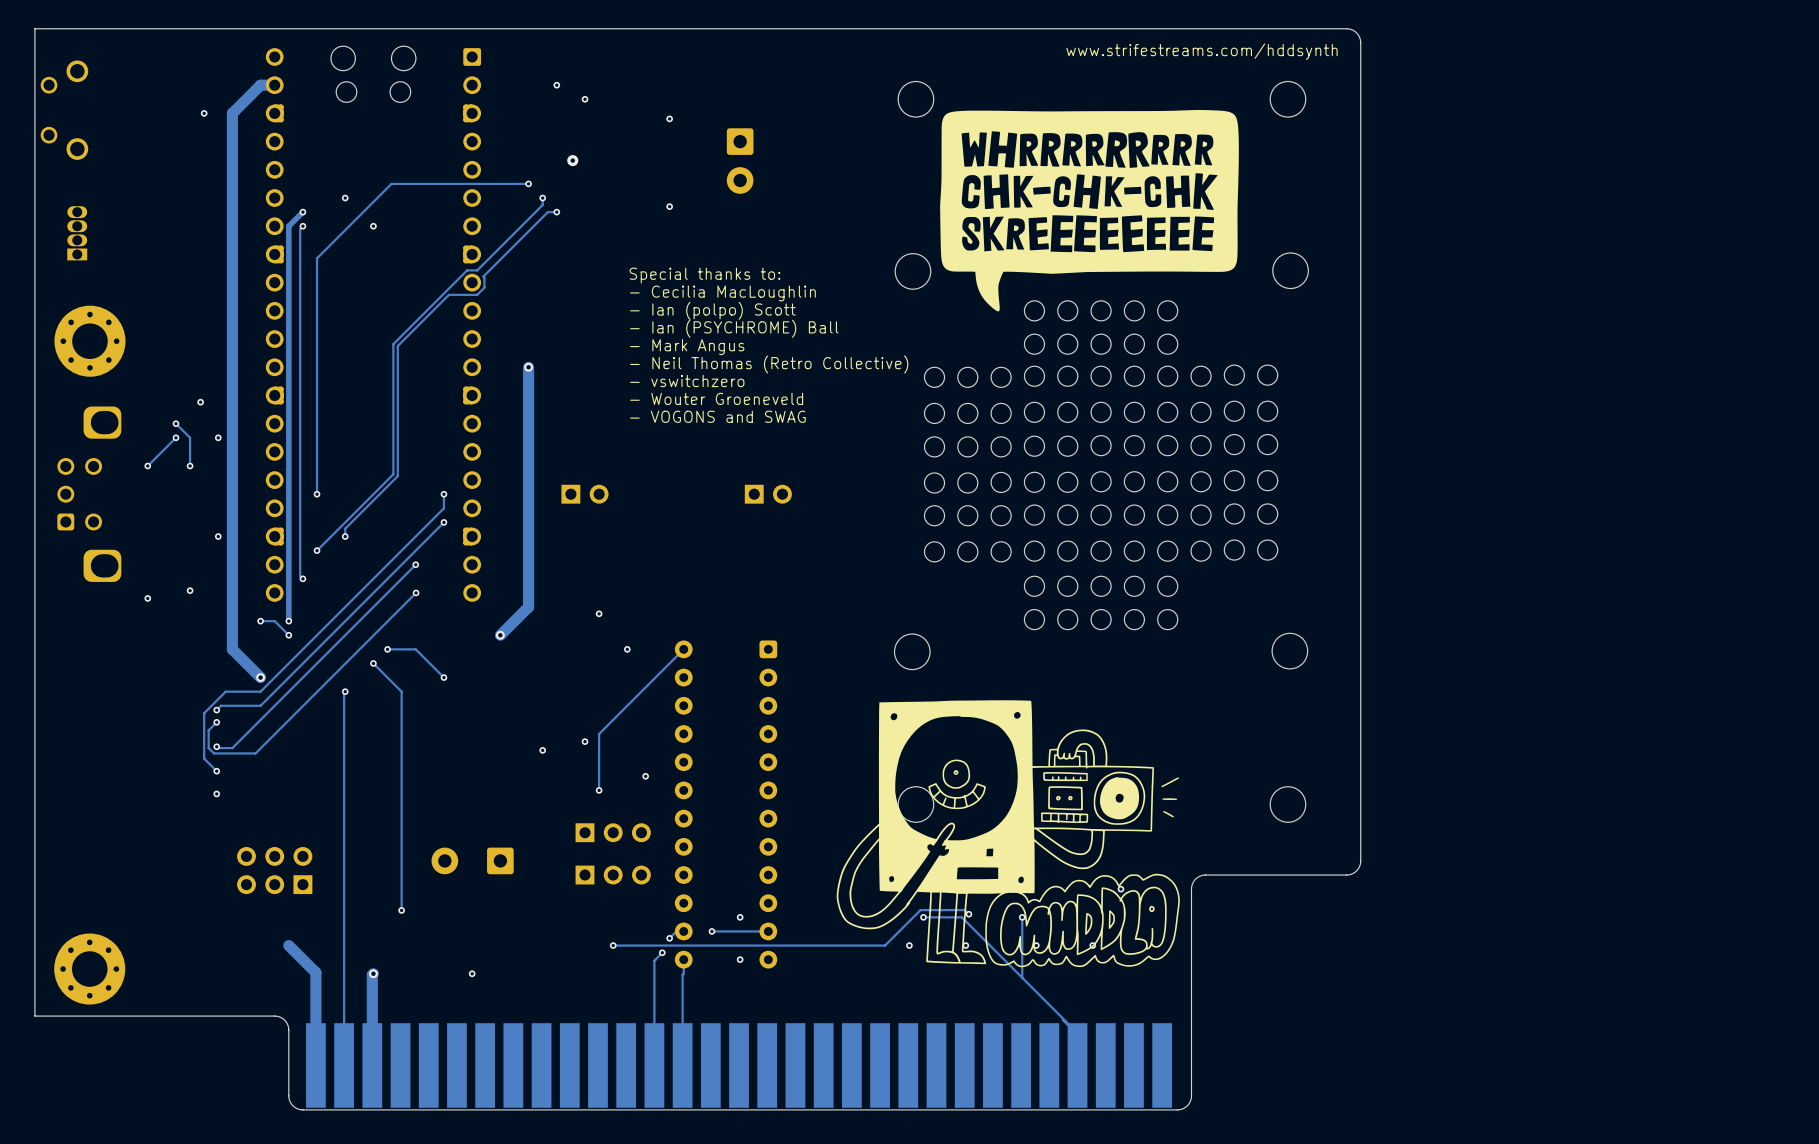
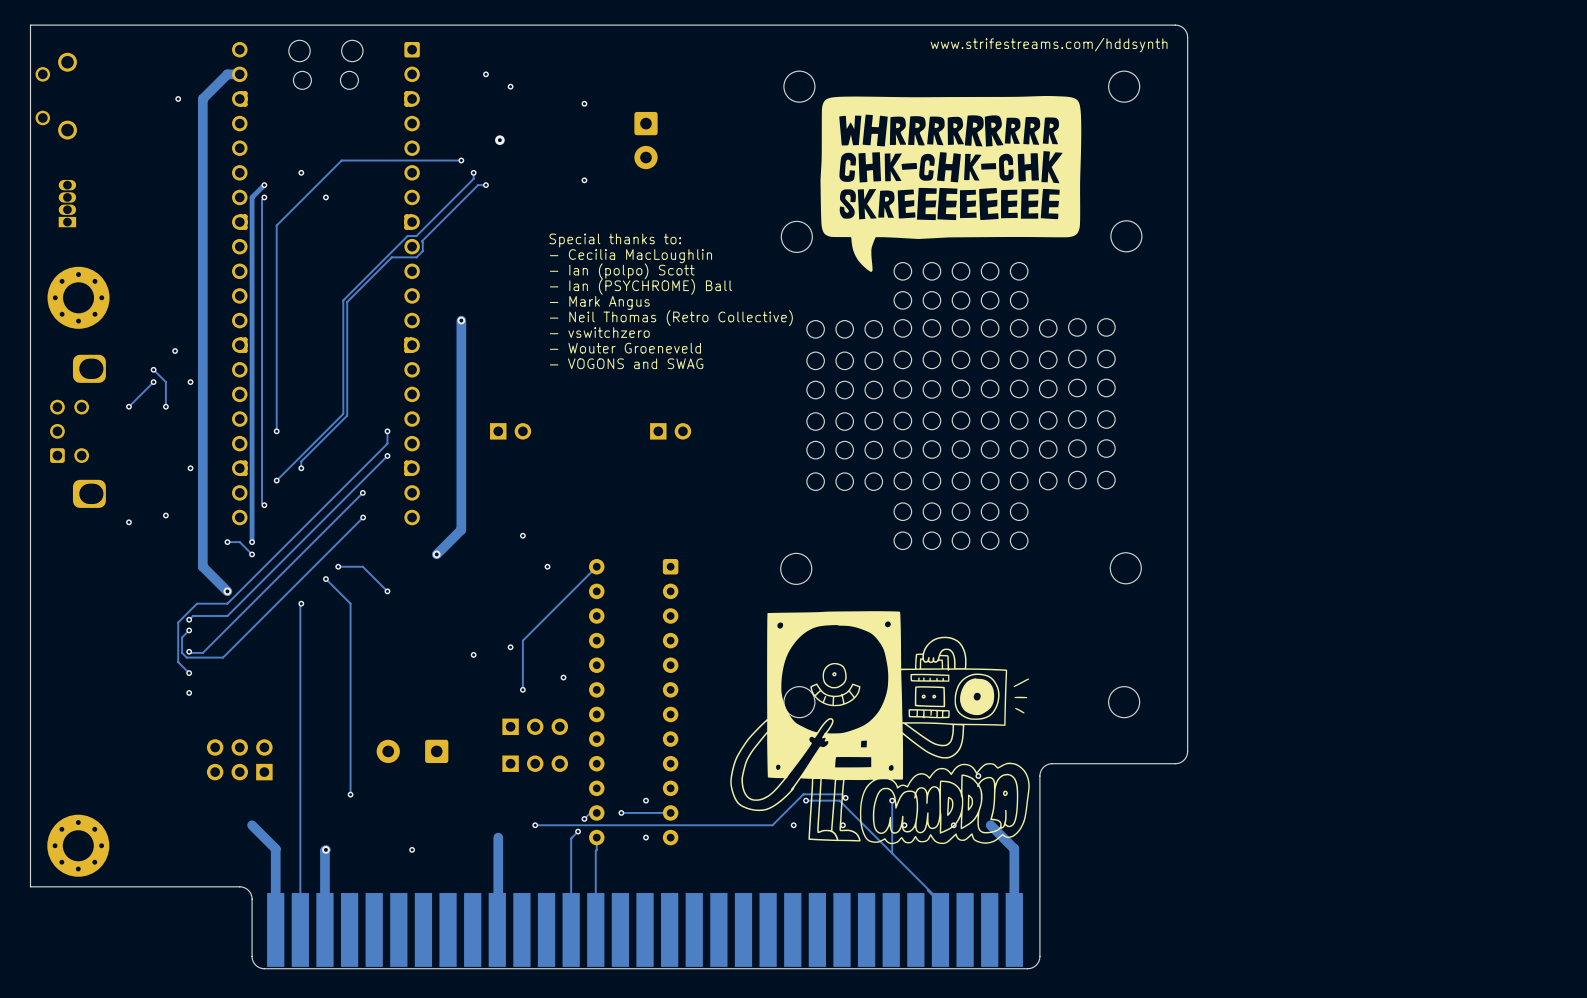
track: none -> (990, 825) (1014, 848) (1014, 929)
track: none -> (498, 837) (497, 929)

